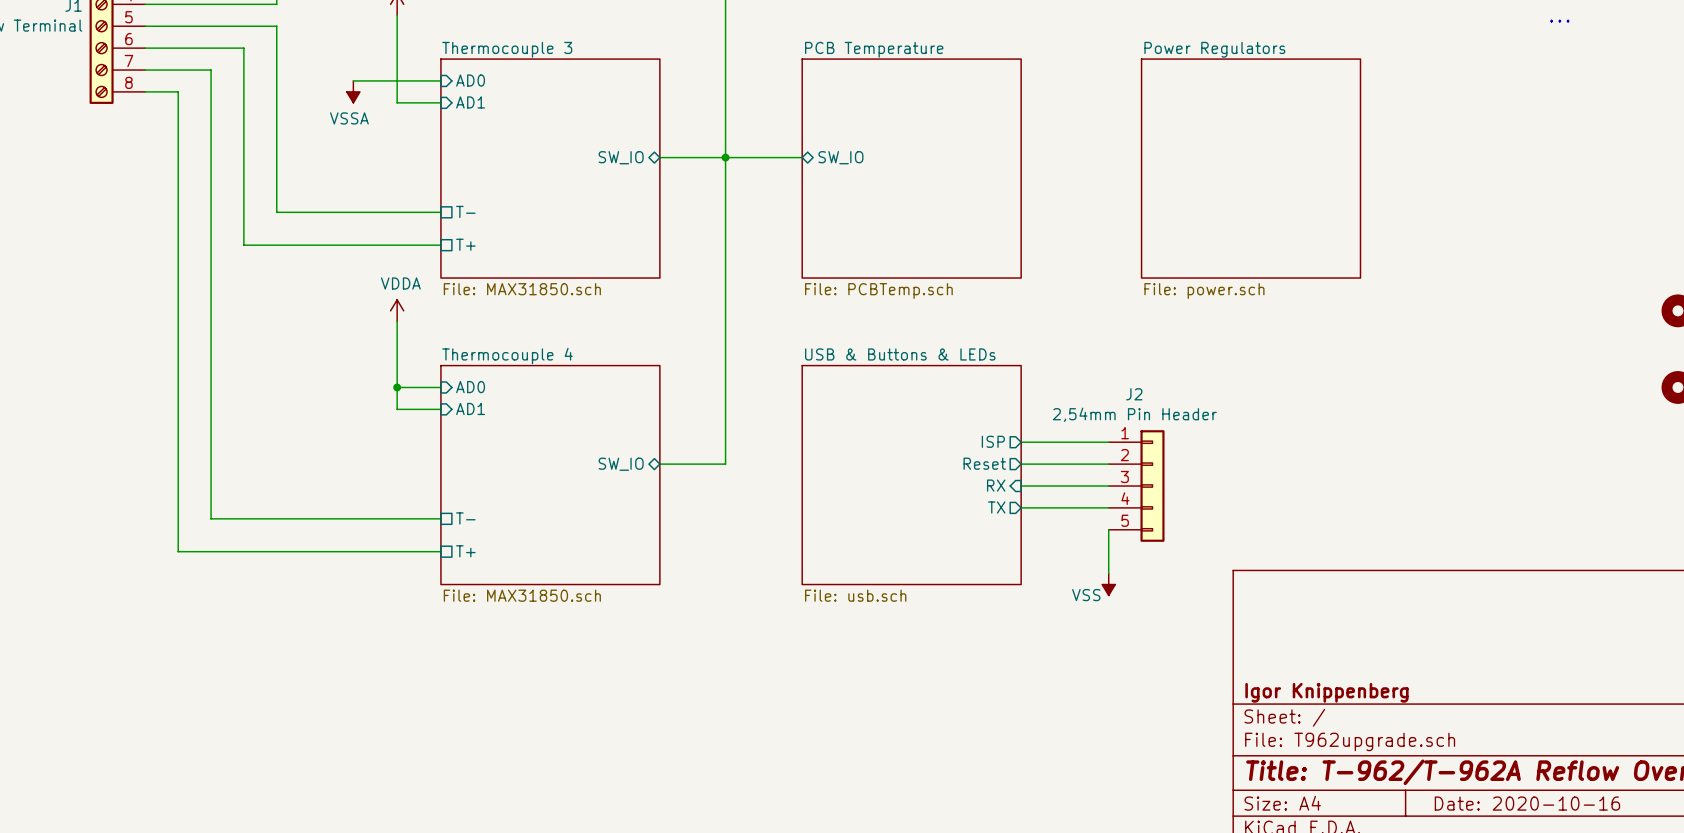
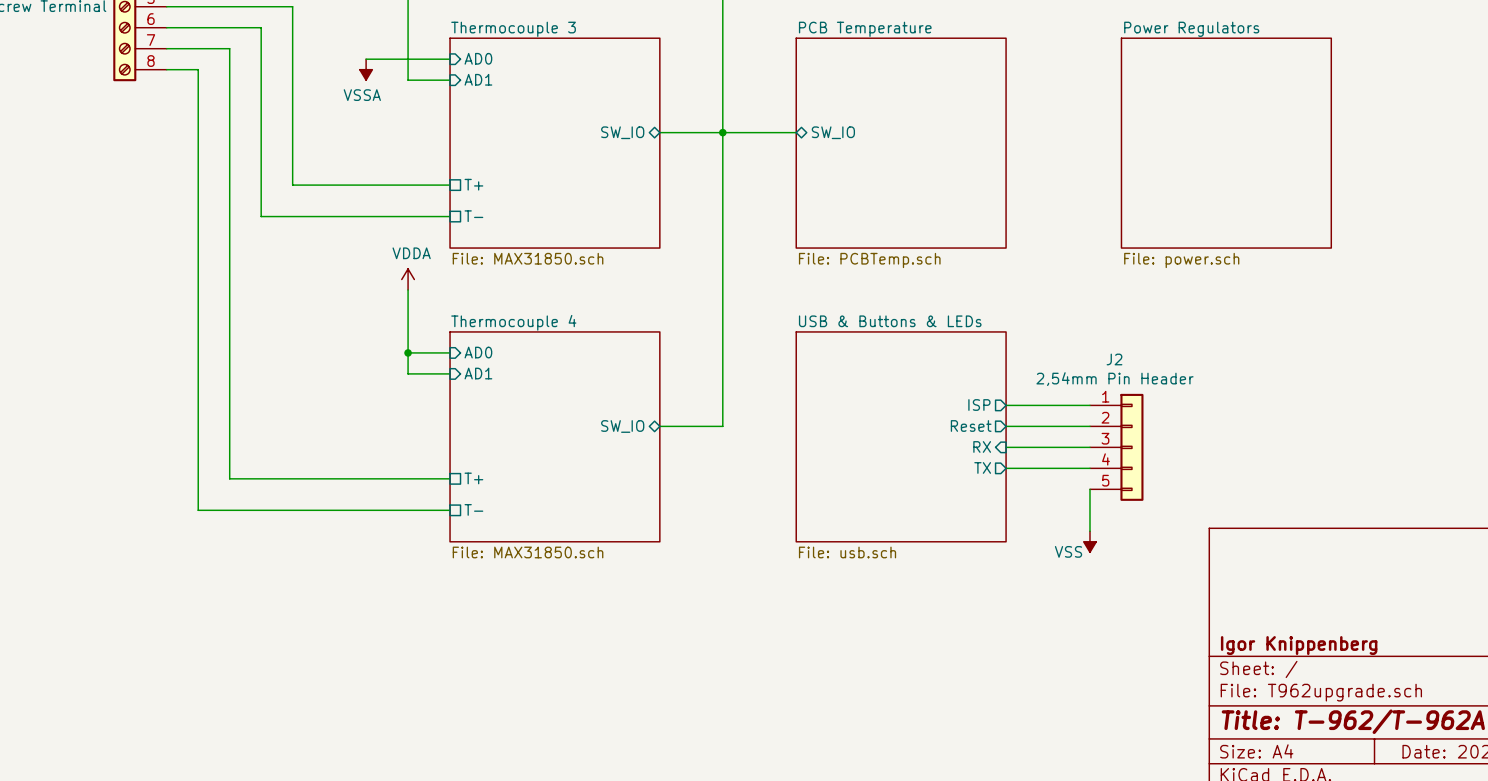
sheet pin: T- (465, 211) -> T+ (473, 184)
sheet pin: T+ (465, 244) -> T- (473, 216)
sheet pin: T- (465, 518) -> T+ (473, 478)
sheet pin: T+ (465, 551) -> T- (473, 509)

